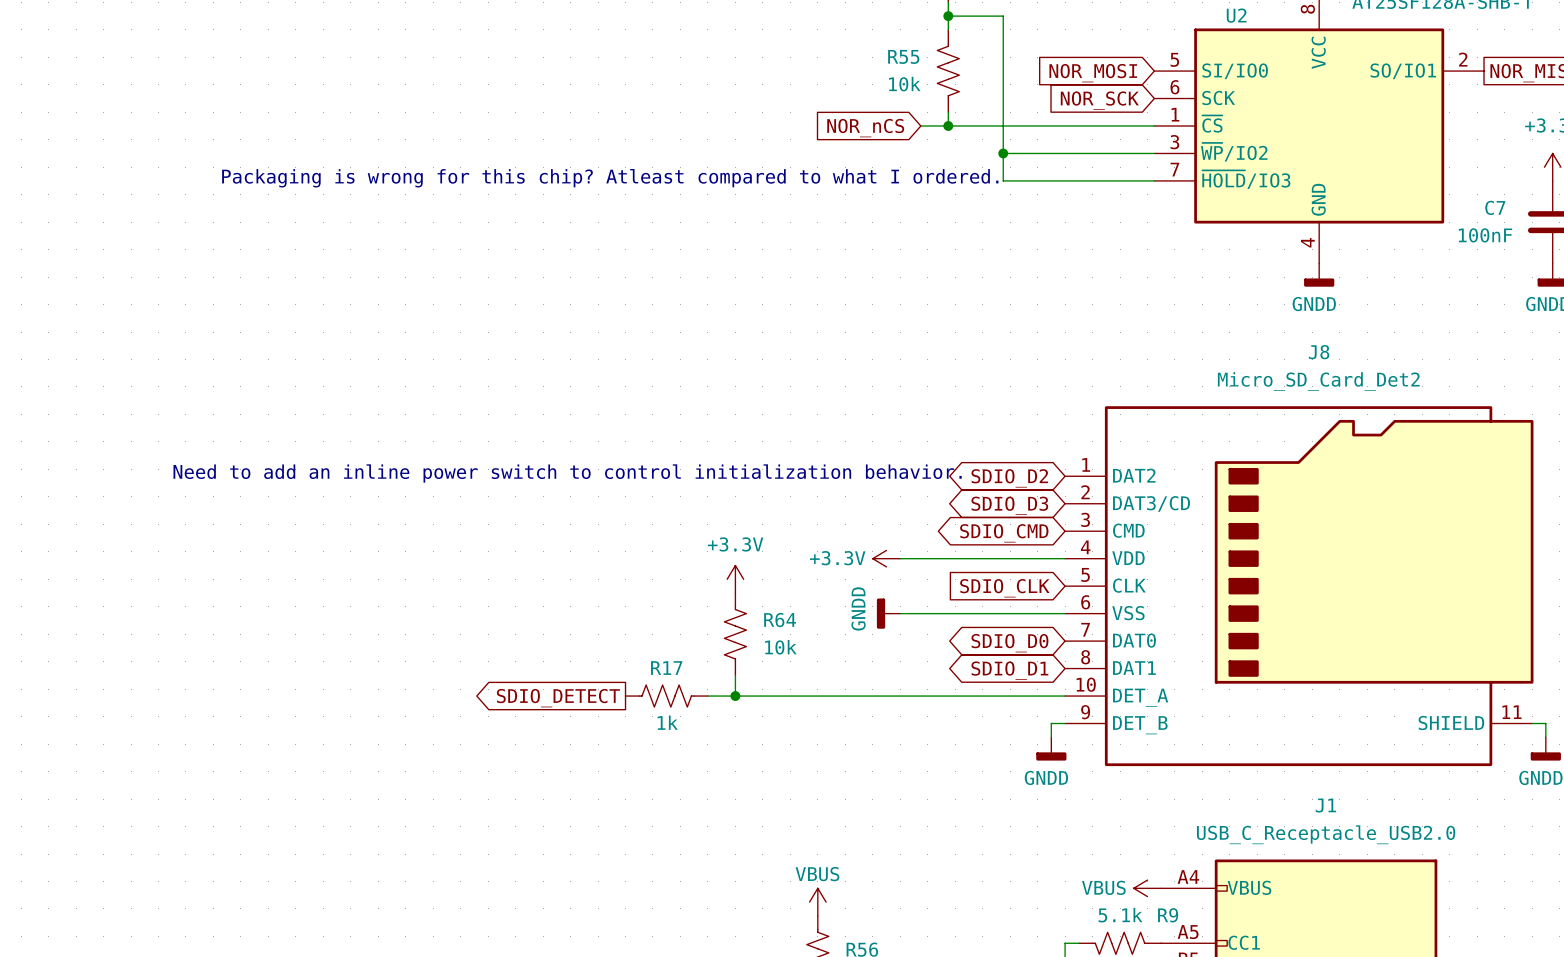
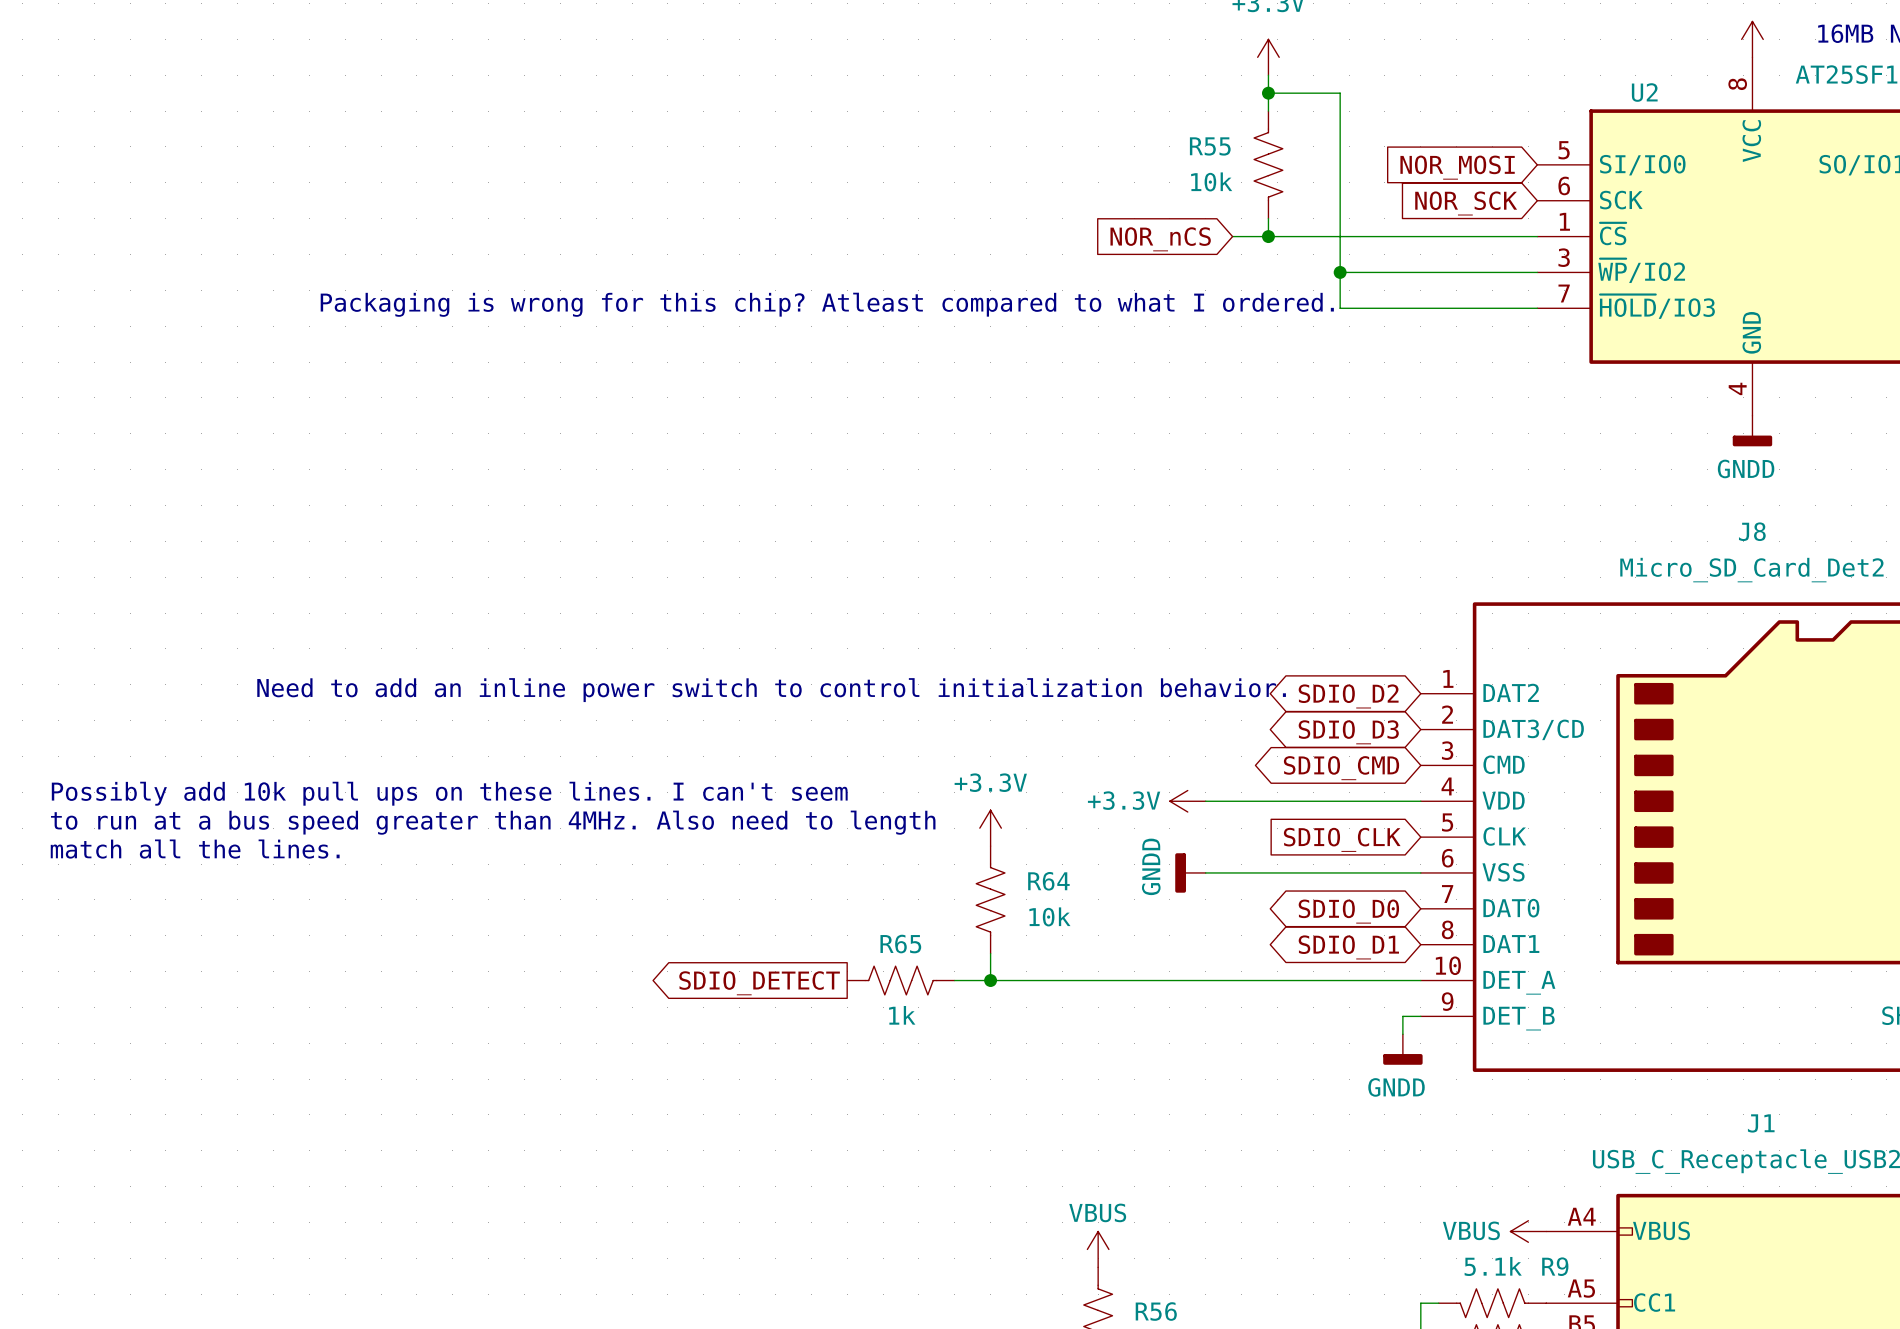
text: none -> Possibly add 10k pull ups on these lines. I can't seem (449, 793)
text: none -> to run at a bus speed greater than 4MHz. Also need to length (493, 822)
text: none -> match all the lines. (195, 849)
R17 name: R17 (666, 668) -> R65 (900, 944)

